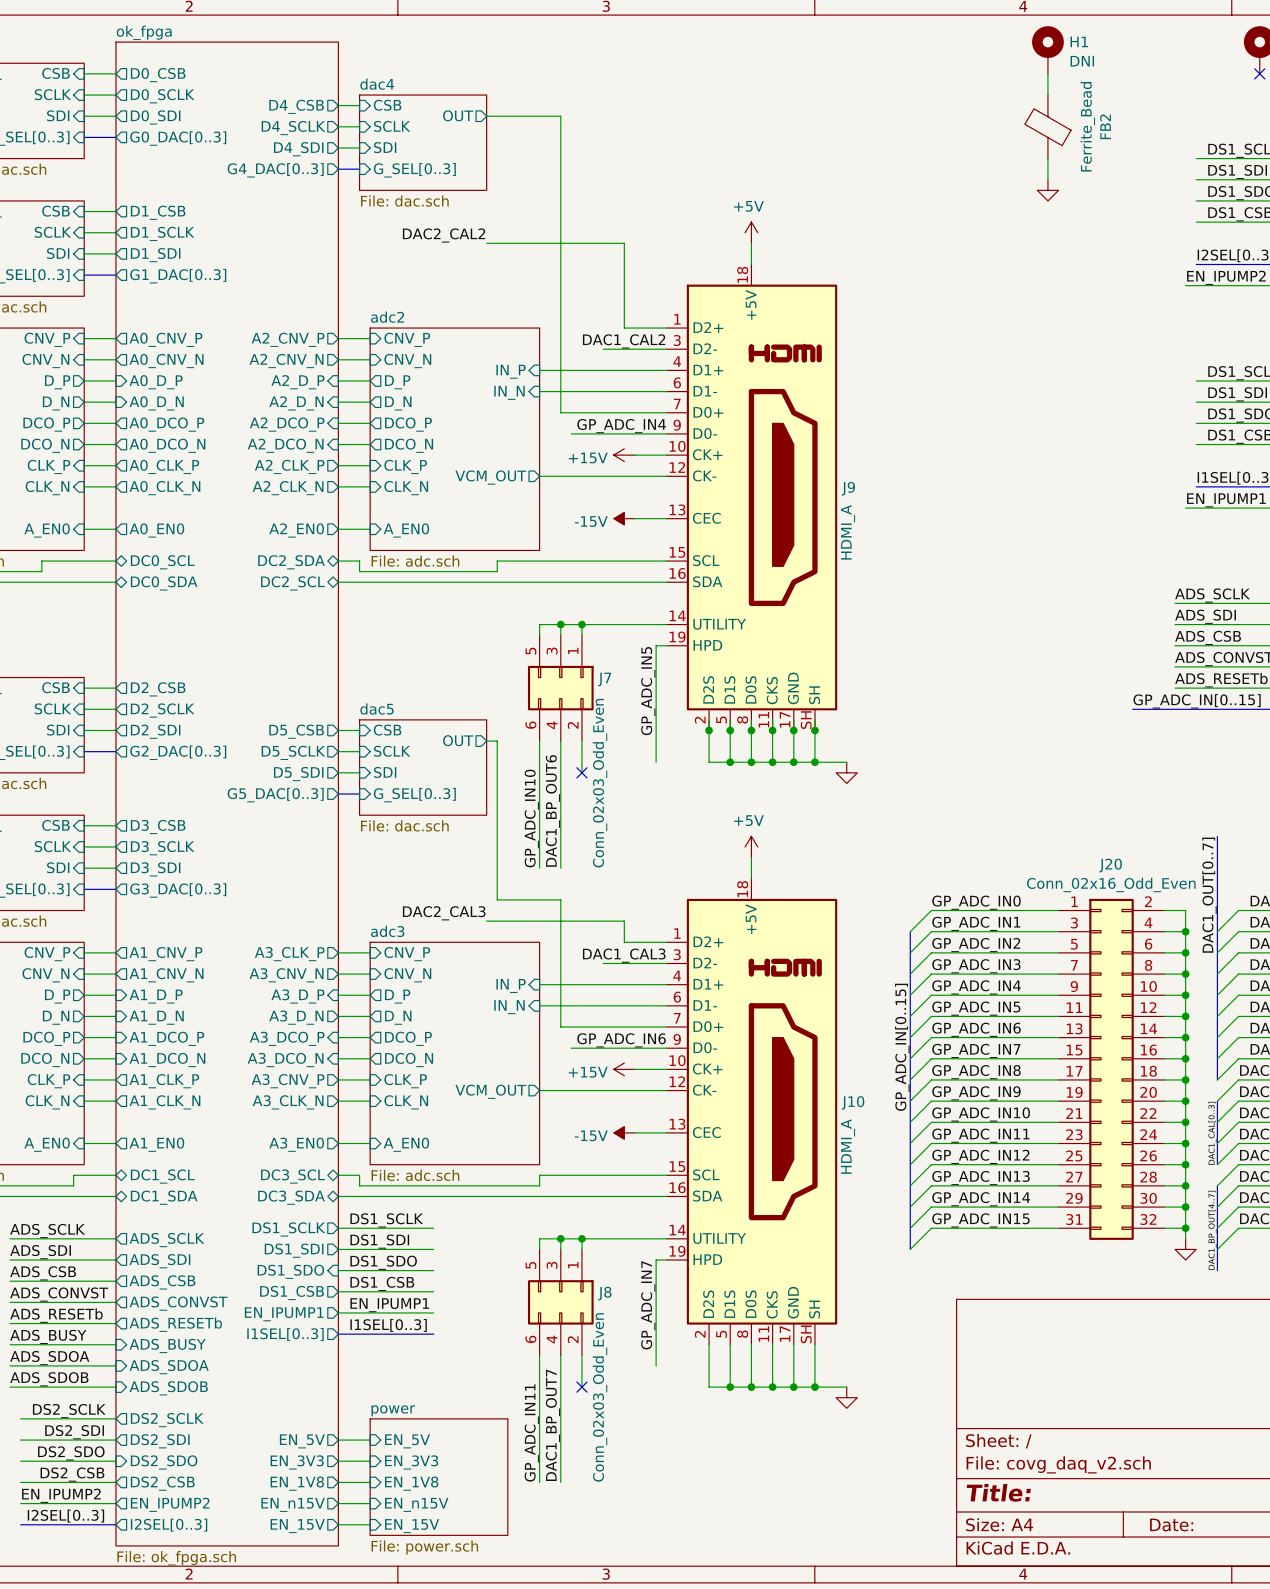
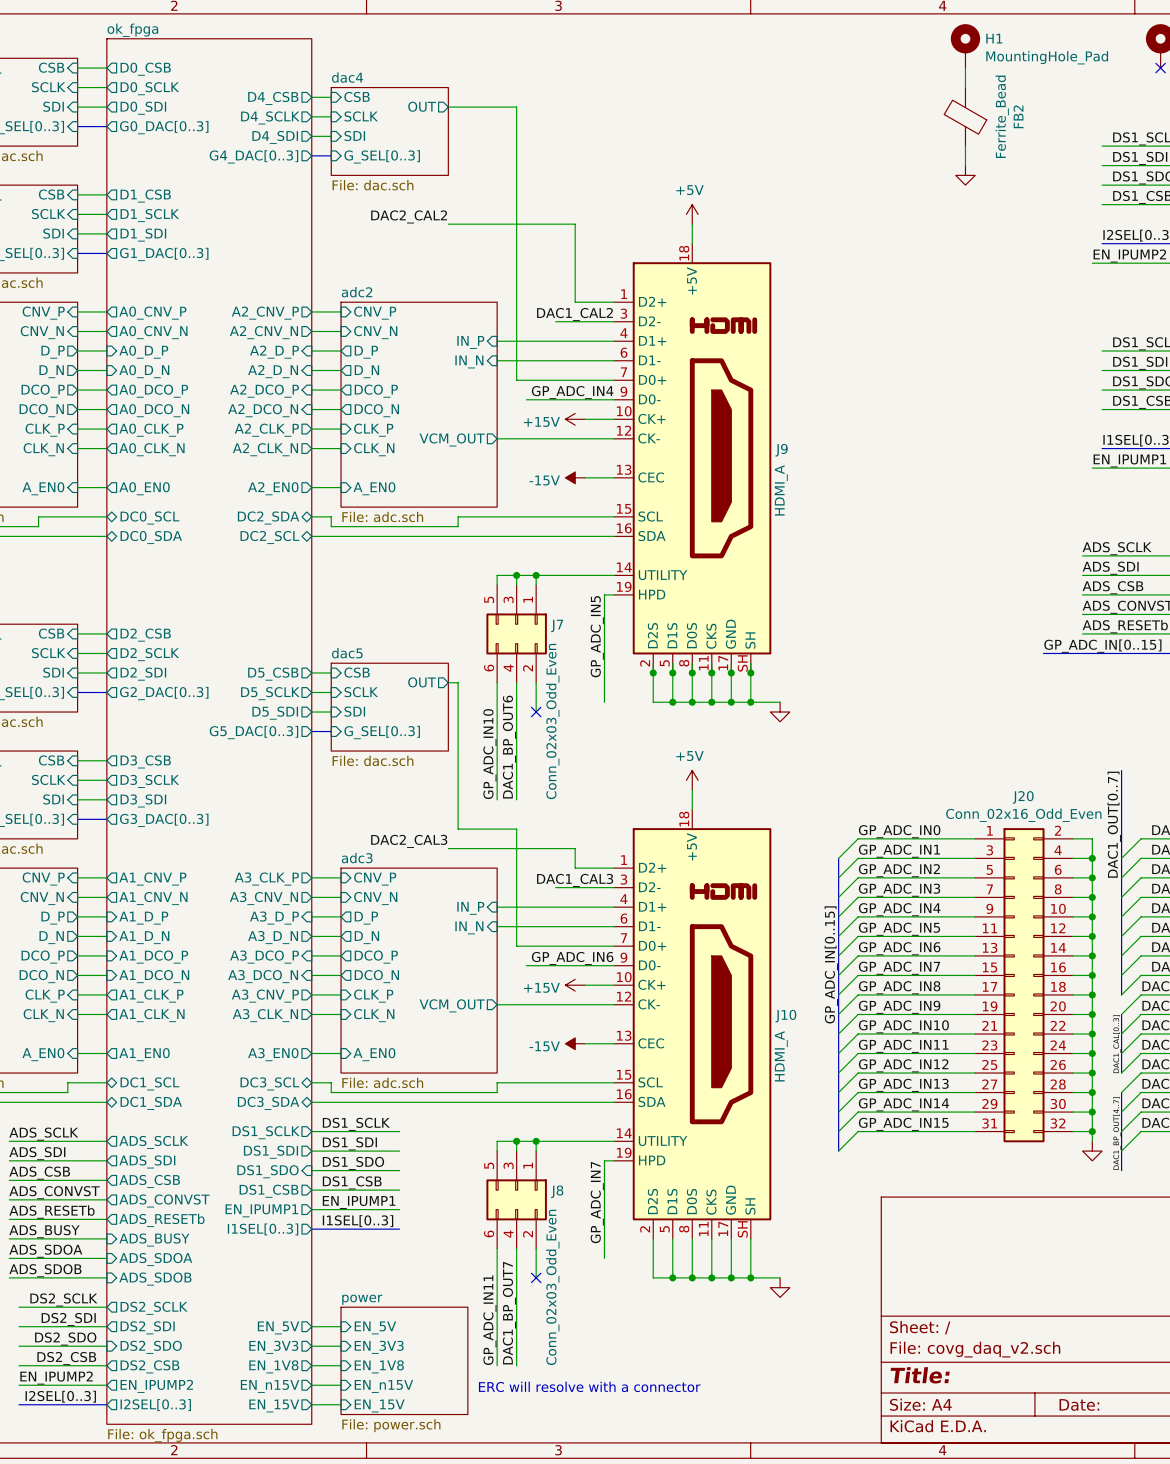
H1 value: DNI (1082, 61) -> MountingHole_Pad (1047, 57)
text: none -> ERC will resolve with a connector (589, 1386)

